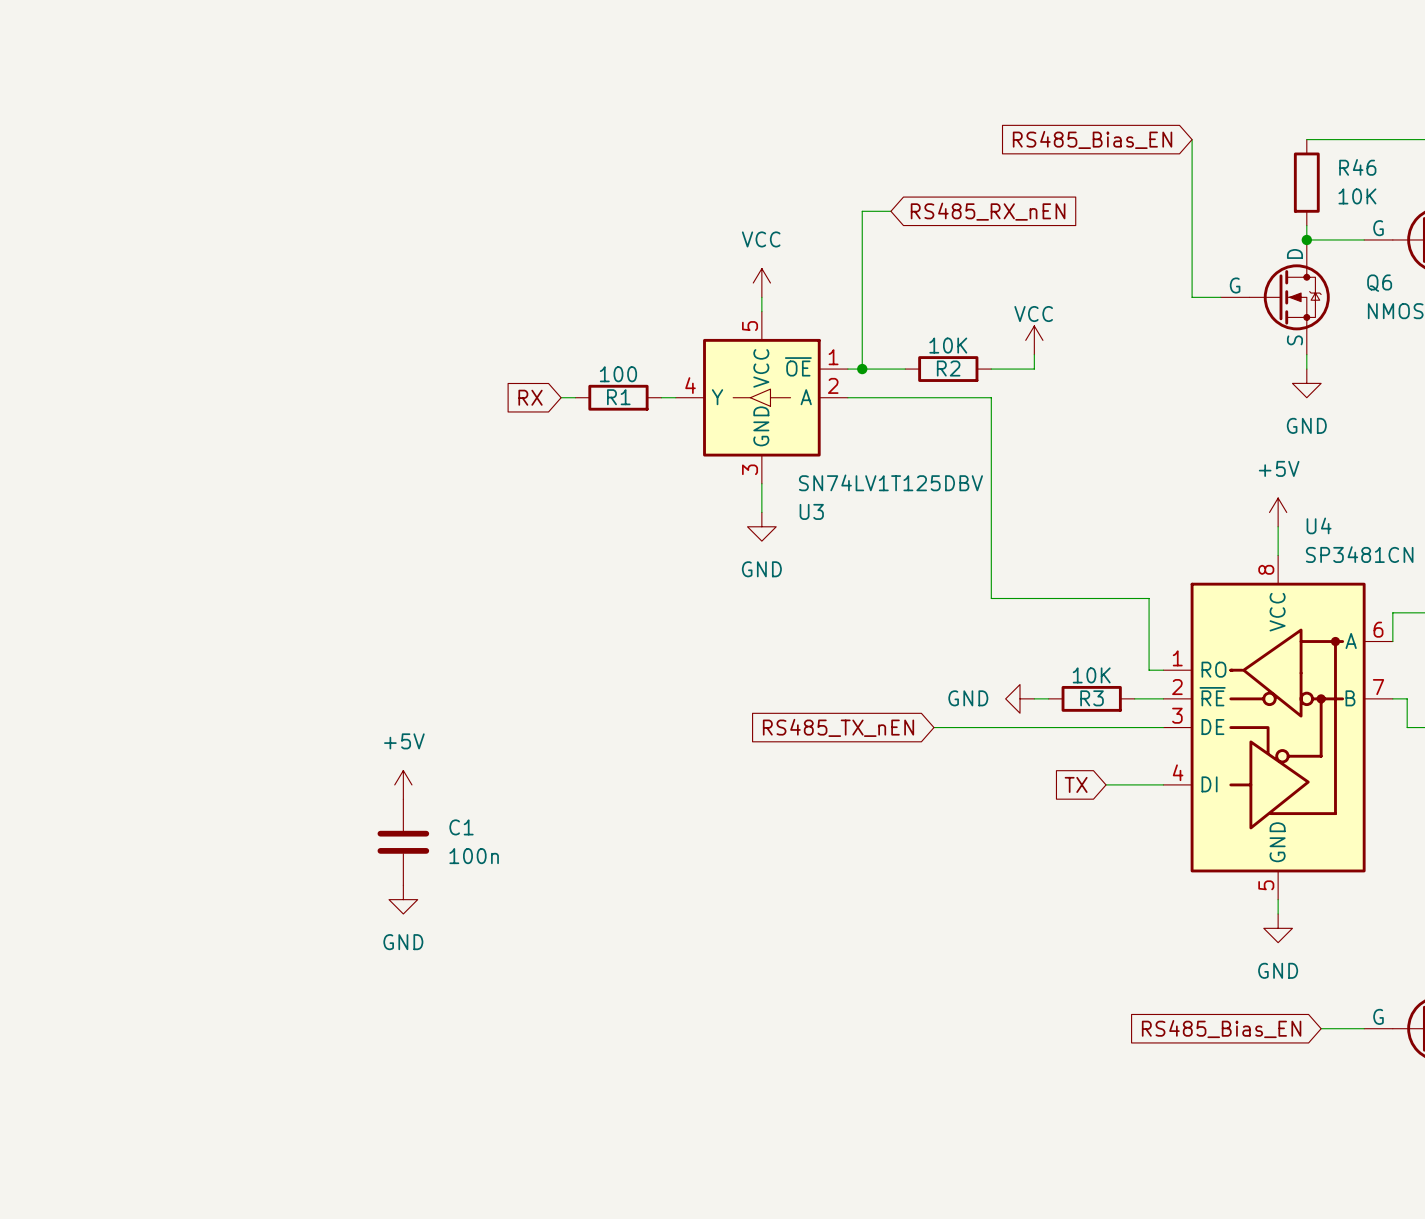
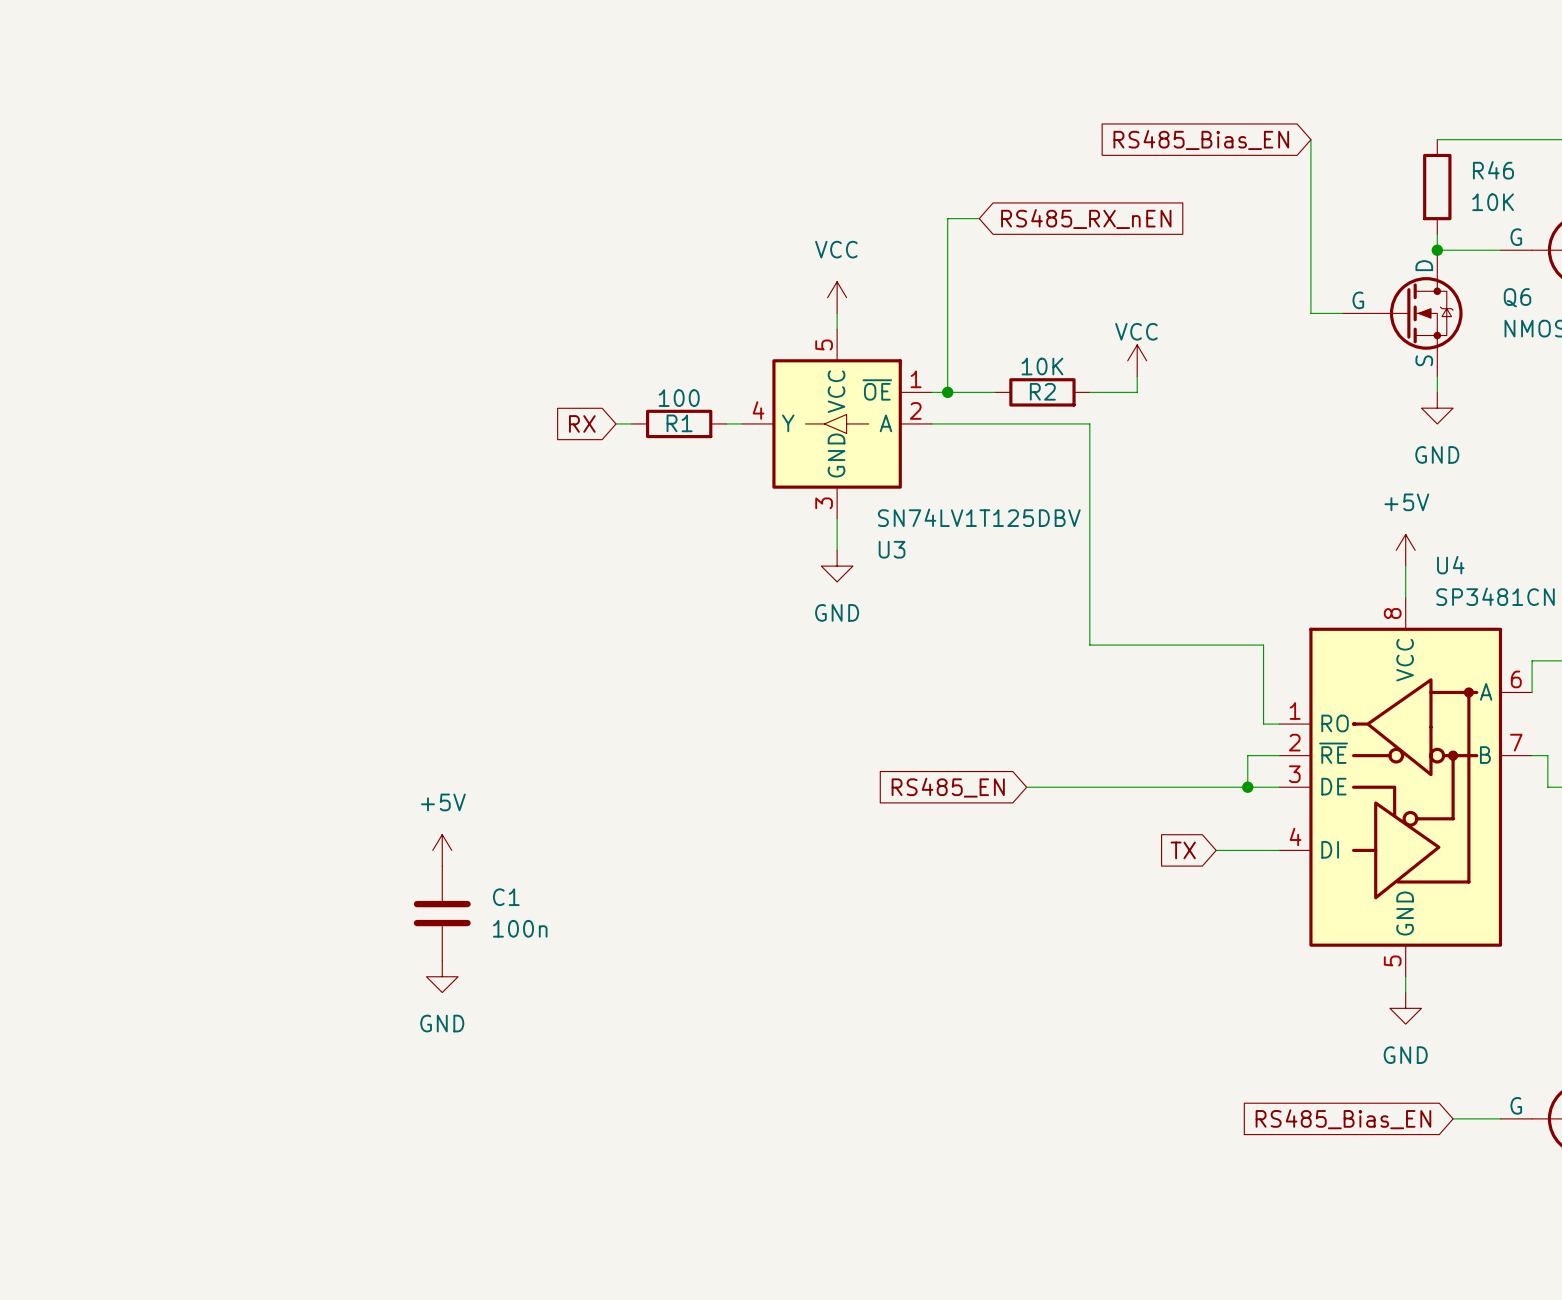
power symbol: GND (1019, 698) -> none
wire: (1034, 698) (1048, 698) -> none
R3: 10K (1091, 698) -> none
wire: none -> (1247, 755) (1247, 787)
global label: RS485_TX_nEN (838, 727) -> RS485_EN (948, 787)
junction: none -> (1247, 787)

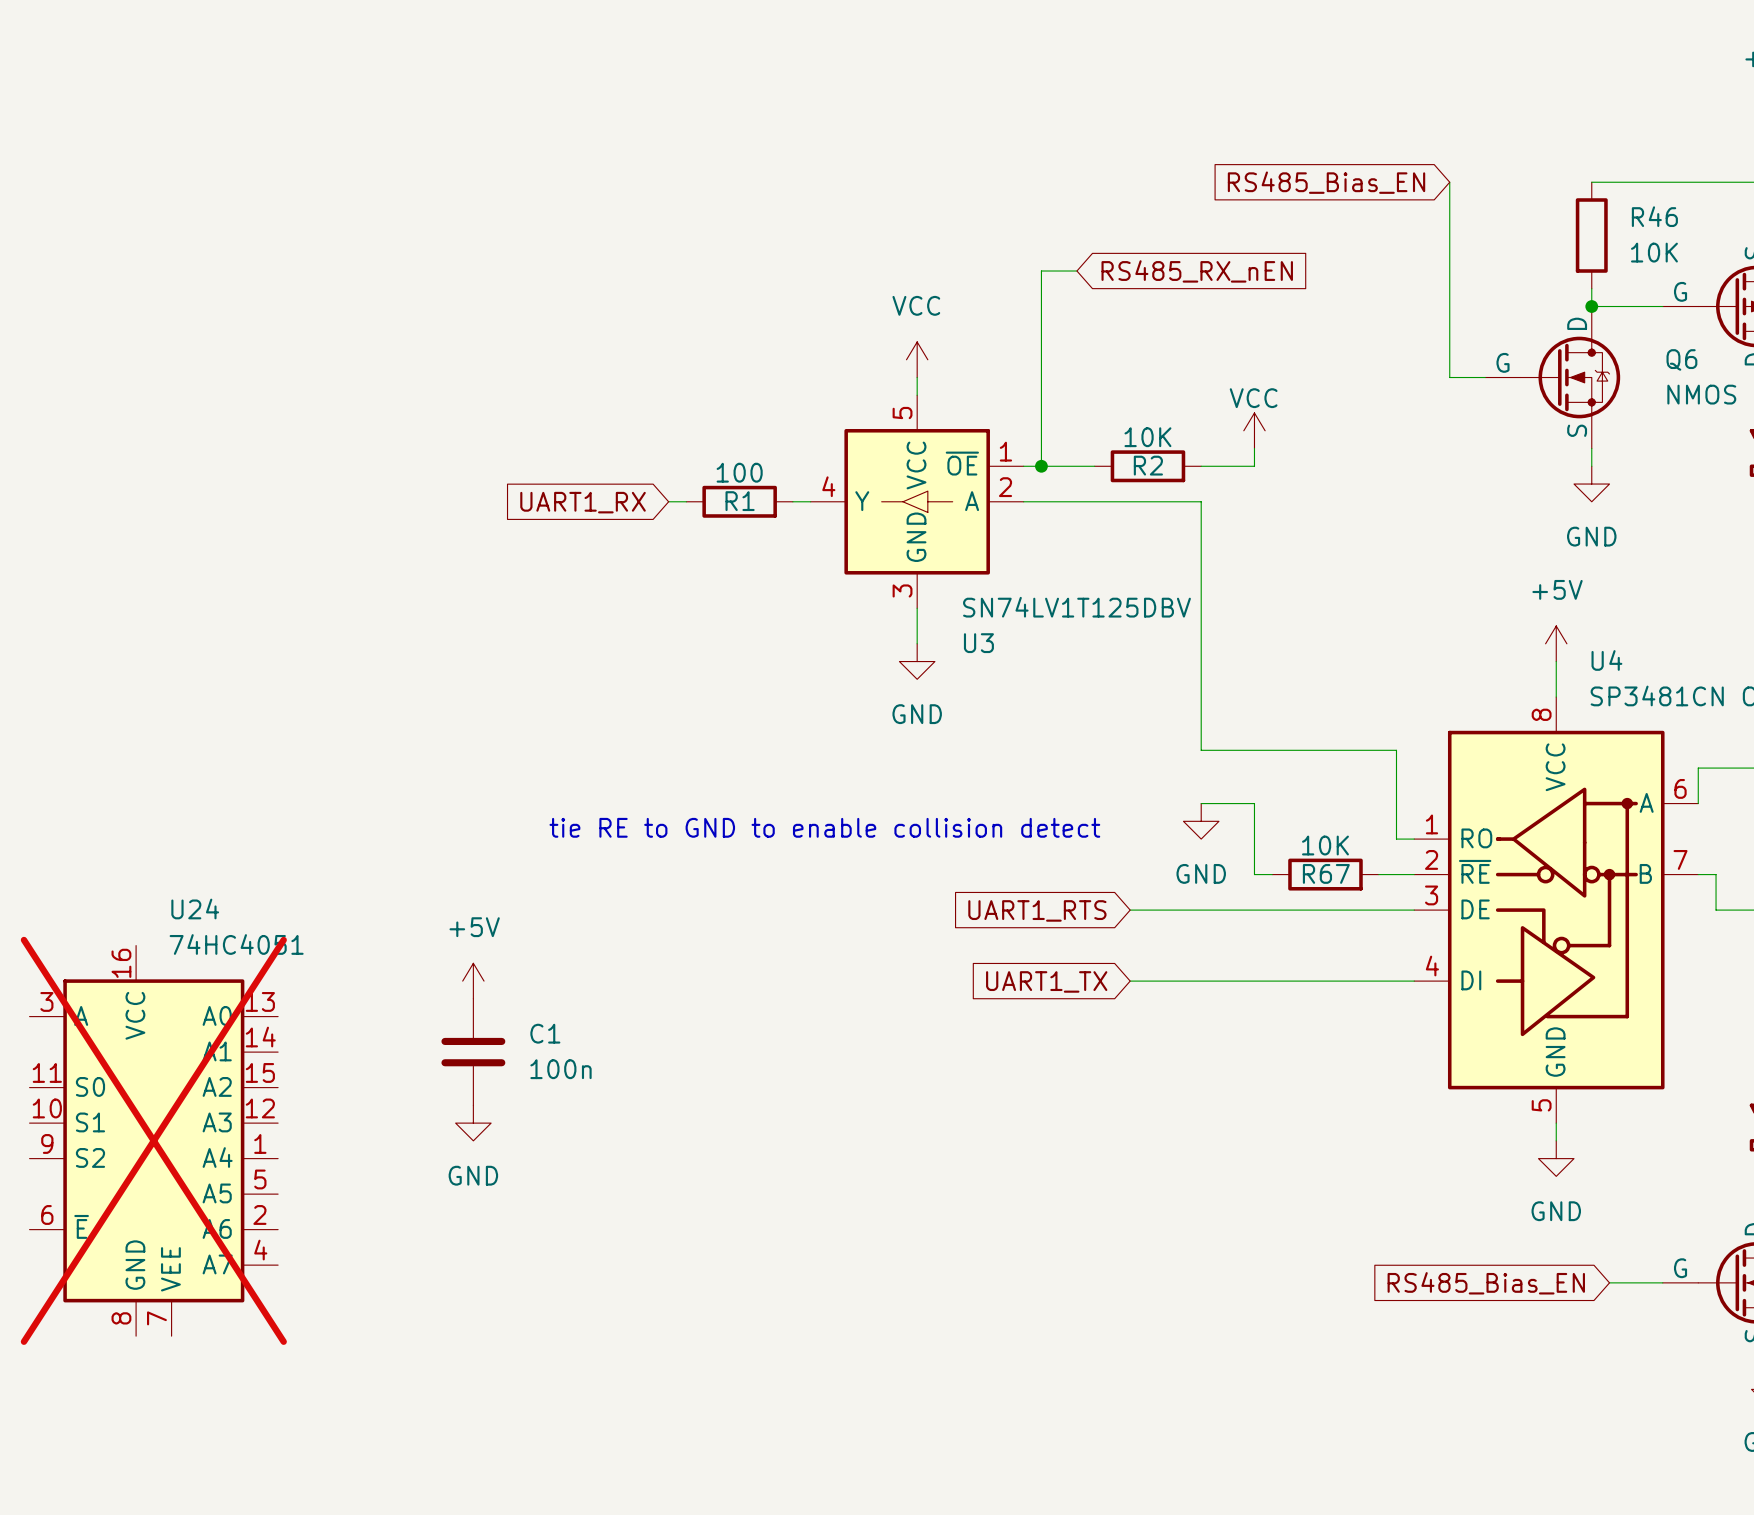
global label: RX (582, 423) -> UART1_RX (583, 502)
wire: none -> (1201, 803) (1254, 803) (1254, 874) (1272, 874)
power symbol: none -> GND (1201, 821)
text: none -> tie RE to GND to enable collision detect (824, 827)
R67: none -> 10K (1325, 874)
wire: (1247, 755) (1247, 787) -> none
global label: RS485_EN (948, 787) -> UART1_RTS (1037, 910)
junction: (1247, 787) -> none
wire: none -> (1130, 981) (1343, 981)
global label: TX (1183, 850) -> none
global label: none -> UART1_TX (1046, 981)
U24: none -> 74HC4051 (153, 1140)

